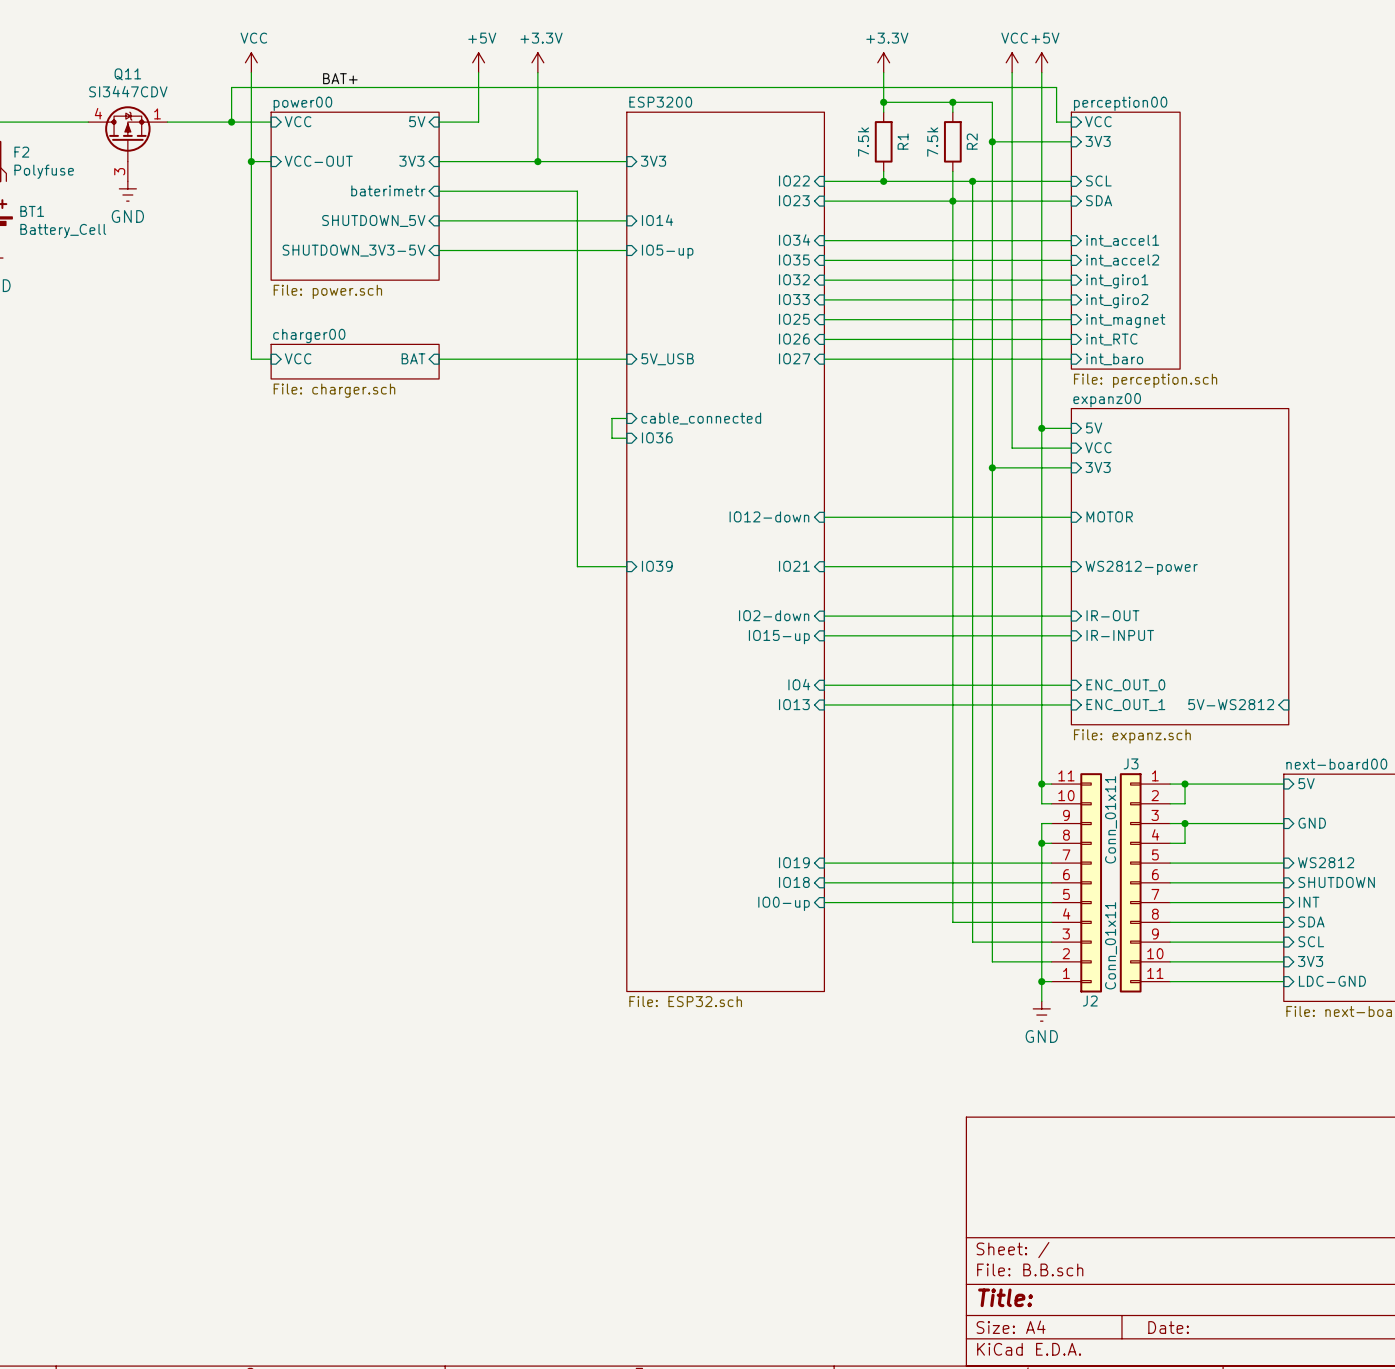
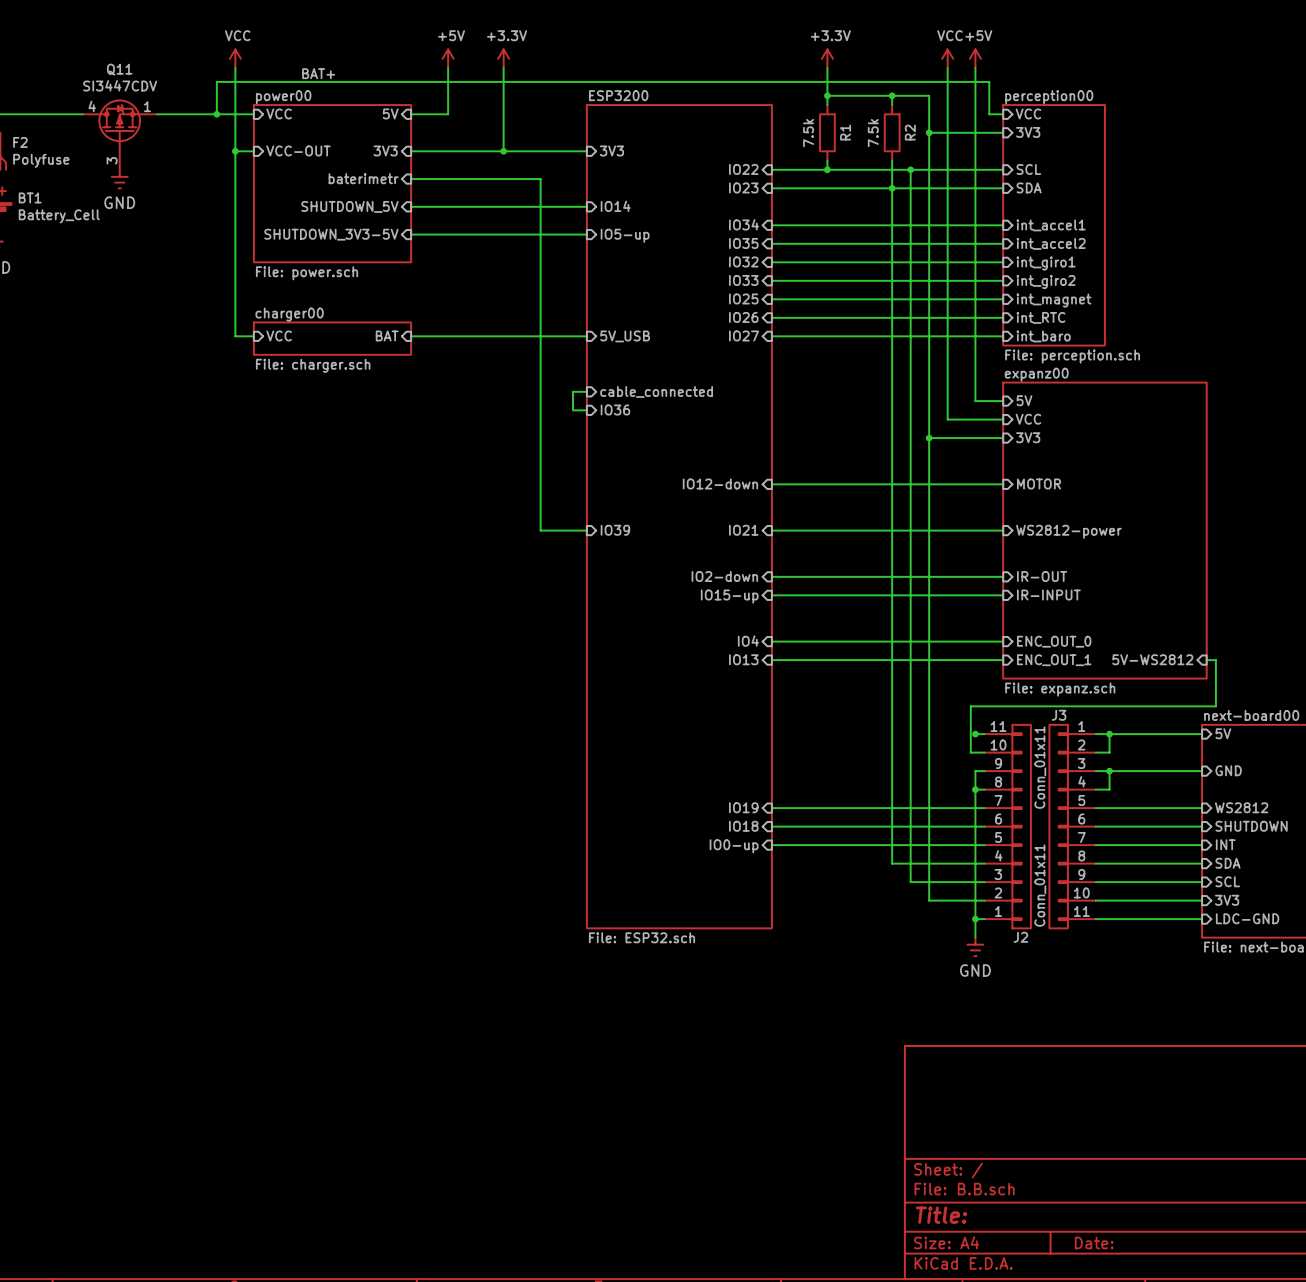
wire: (1041, 428) (1041, 803) -> (1206, 660) (1215, 660) (1215, 706) (970, 706) (970, 752) (975, 752)
junction: (1041, 428) -> none

